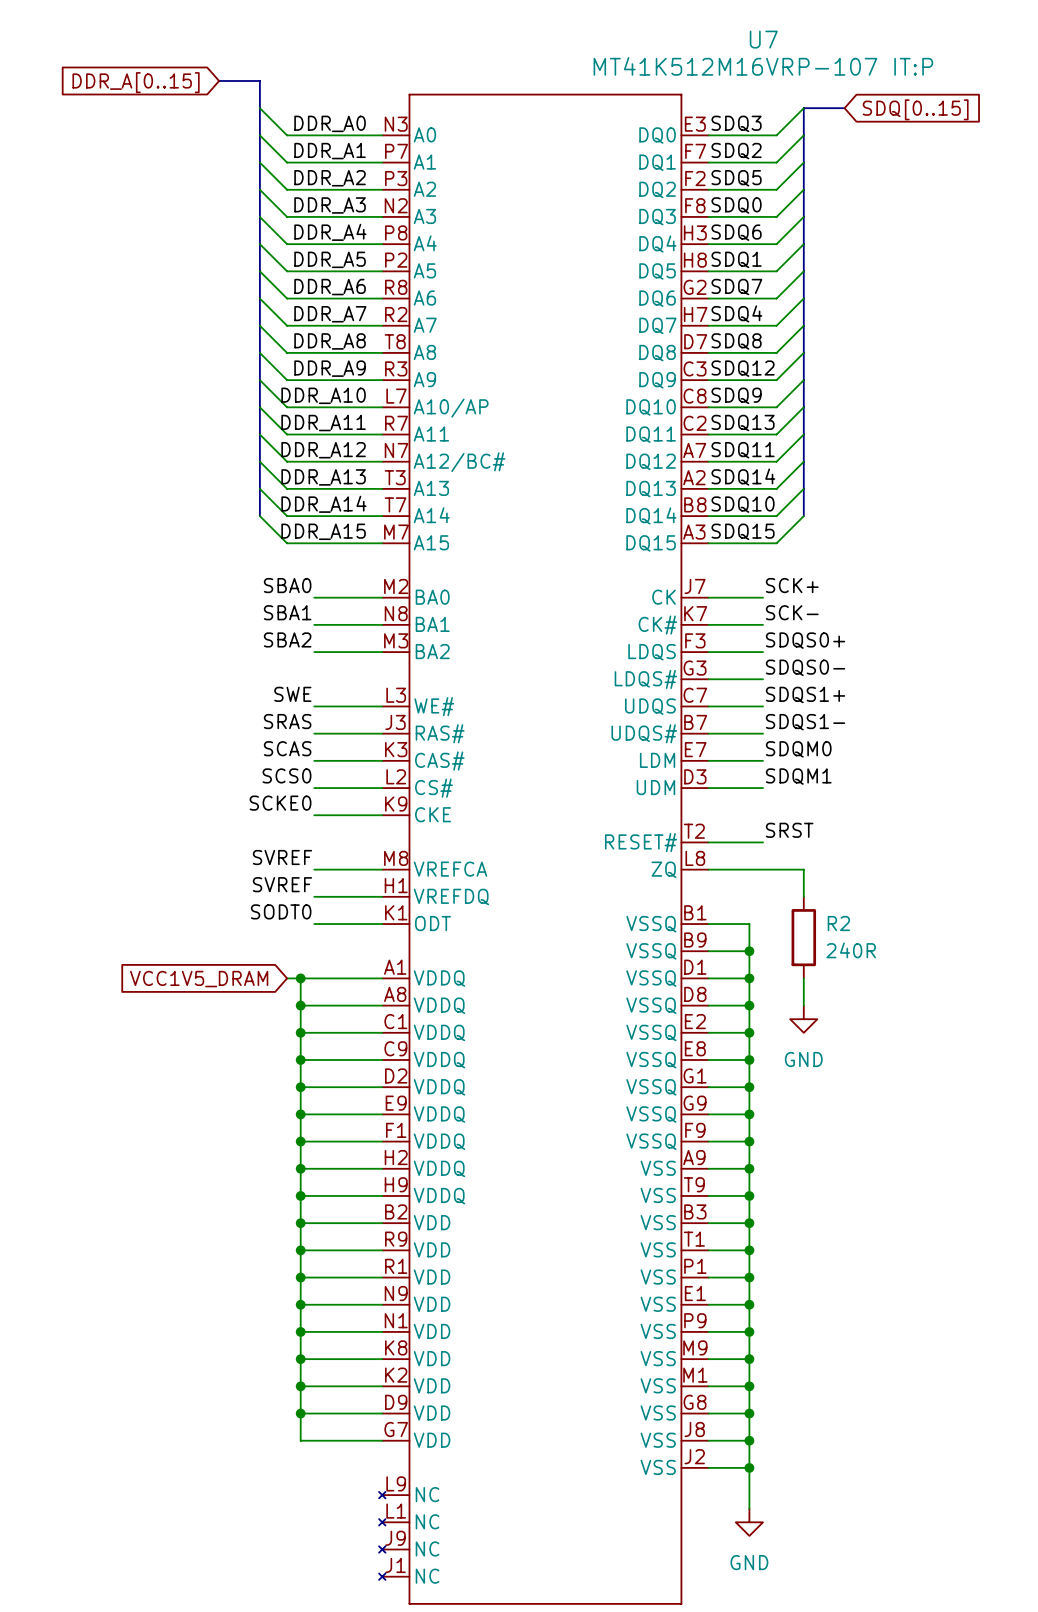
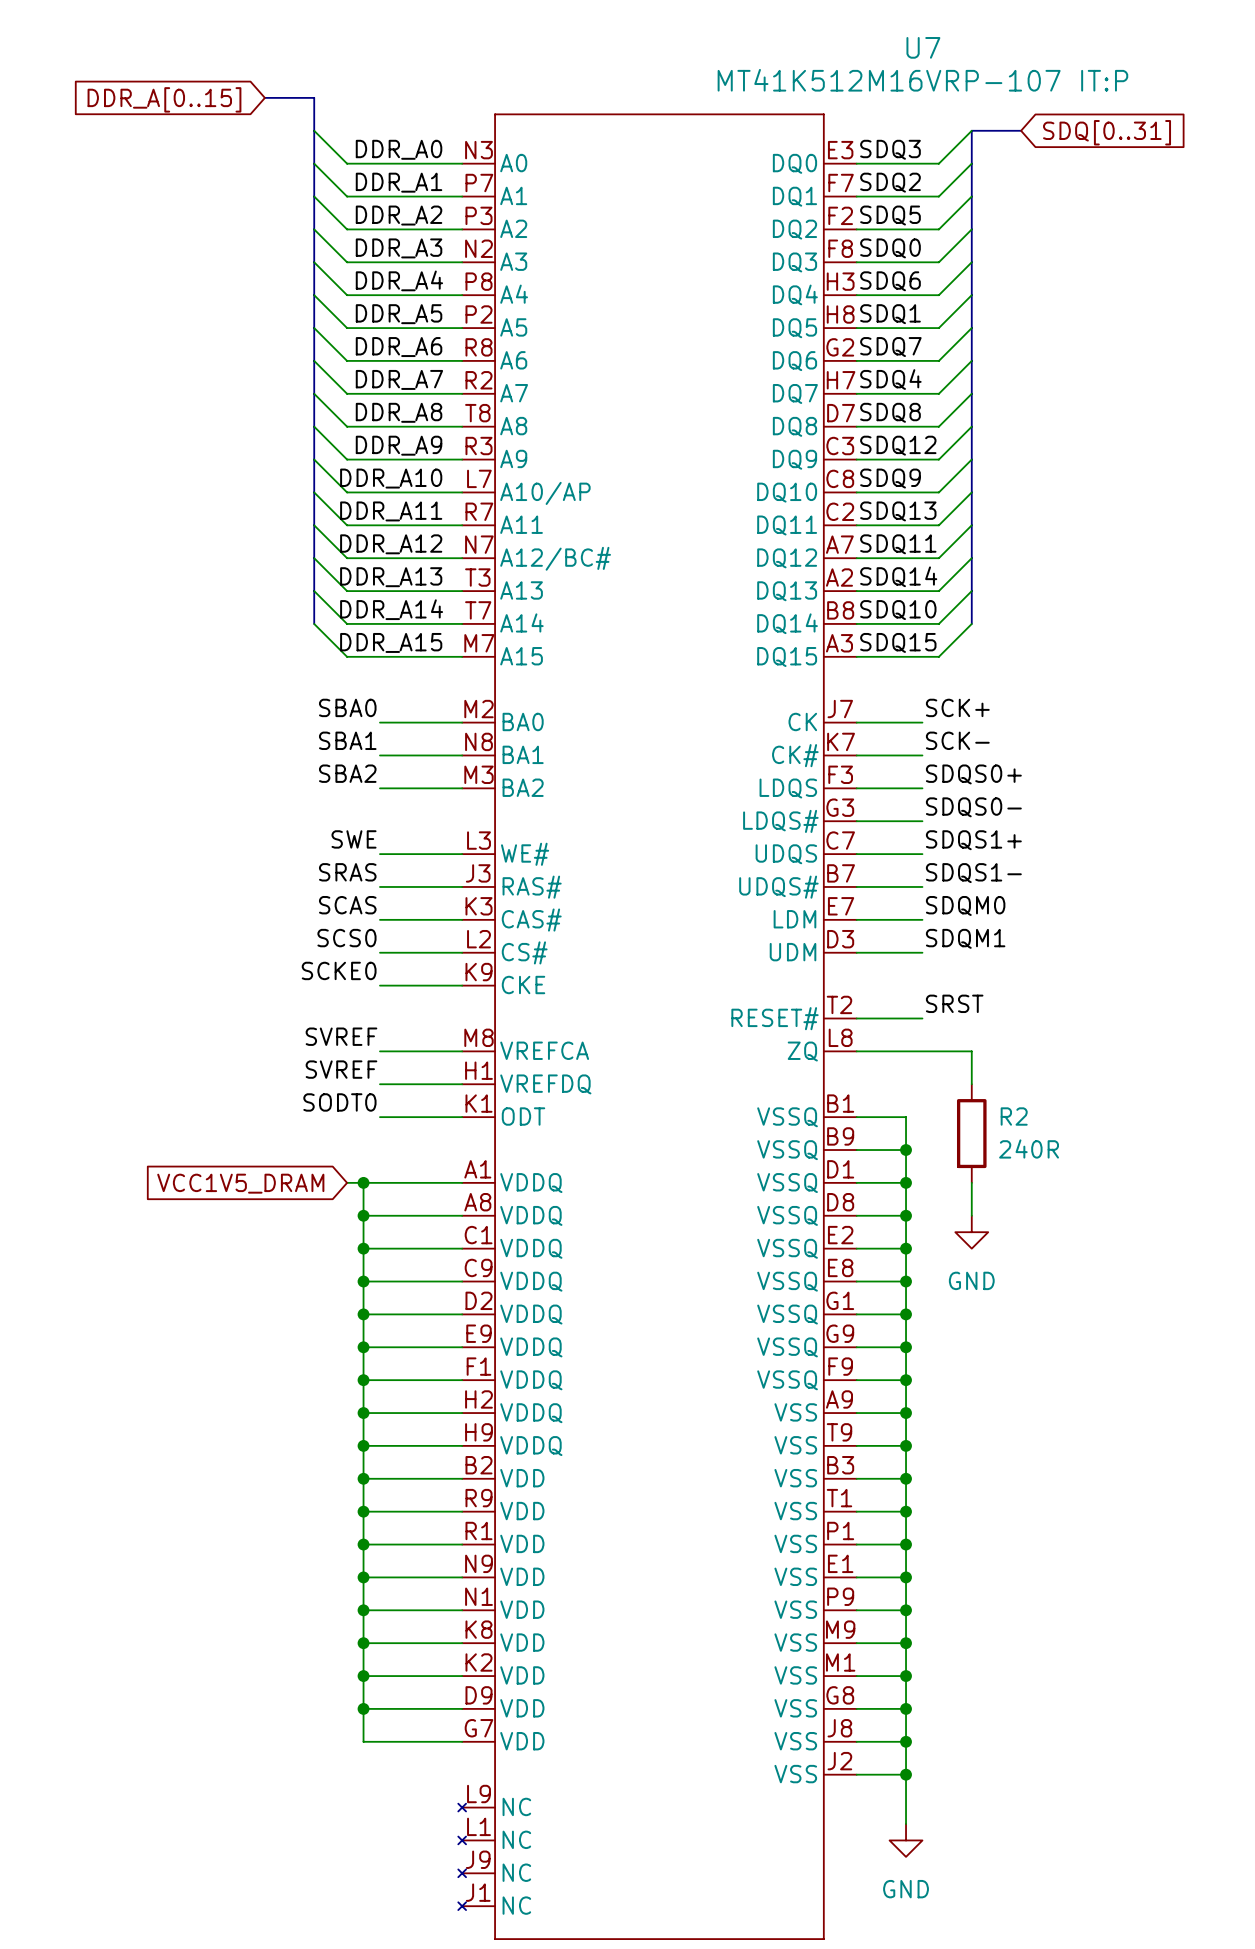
global label: SDQ[0..15] (915, 109) -> SDQ[0..31] (1107, 132)

